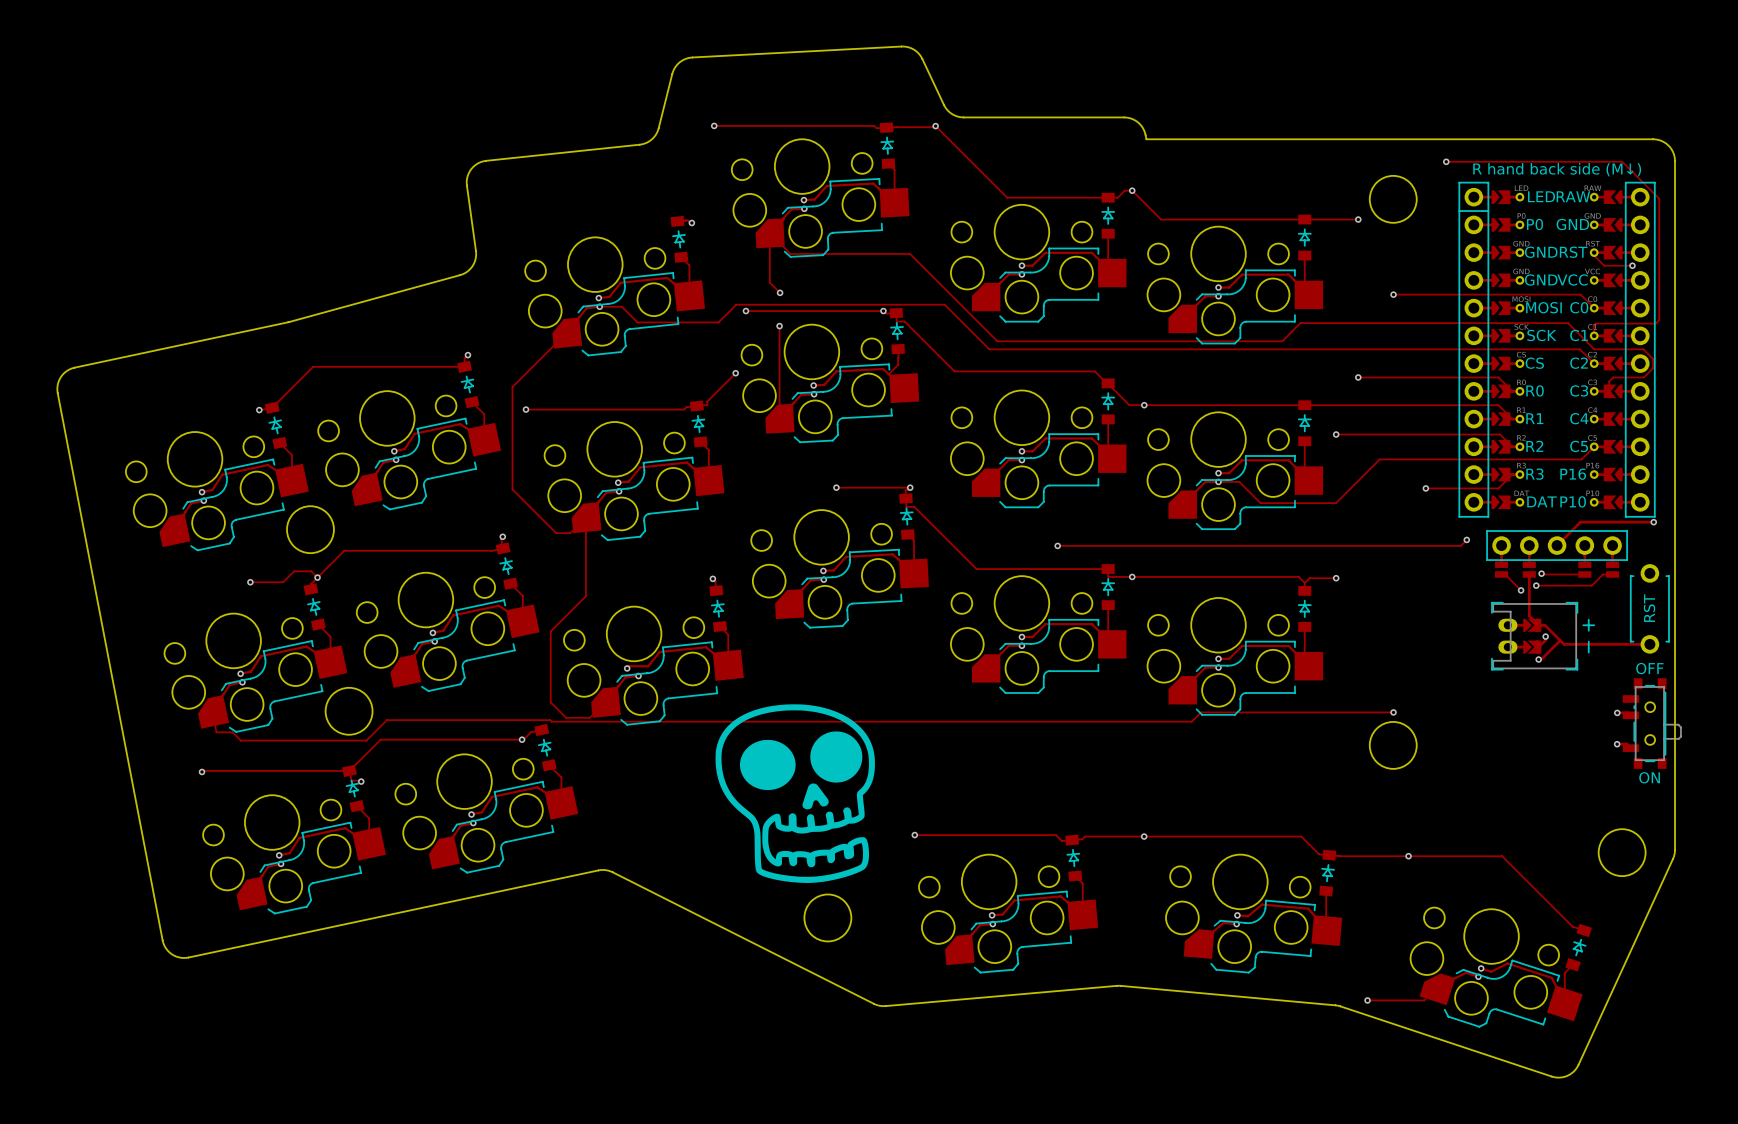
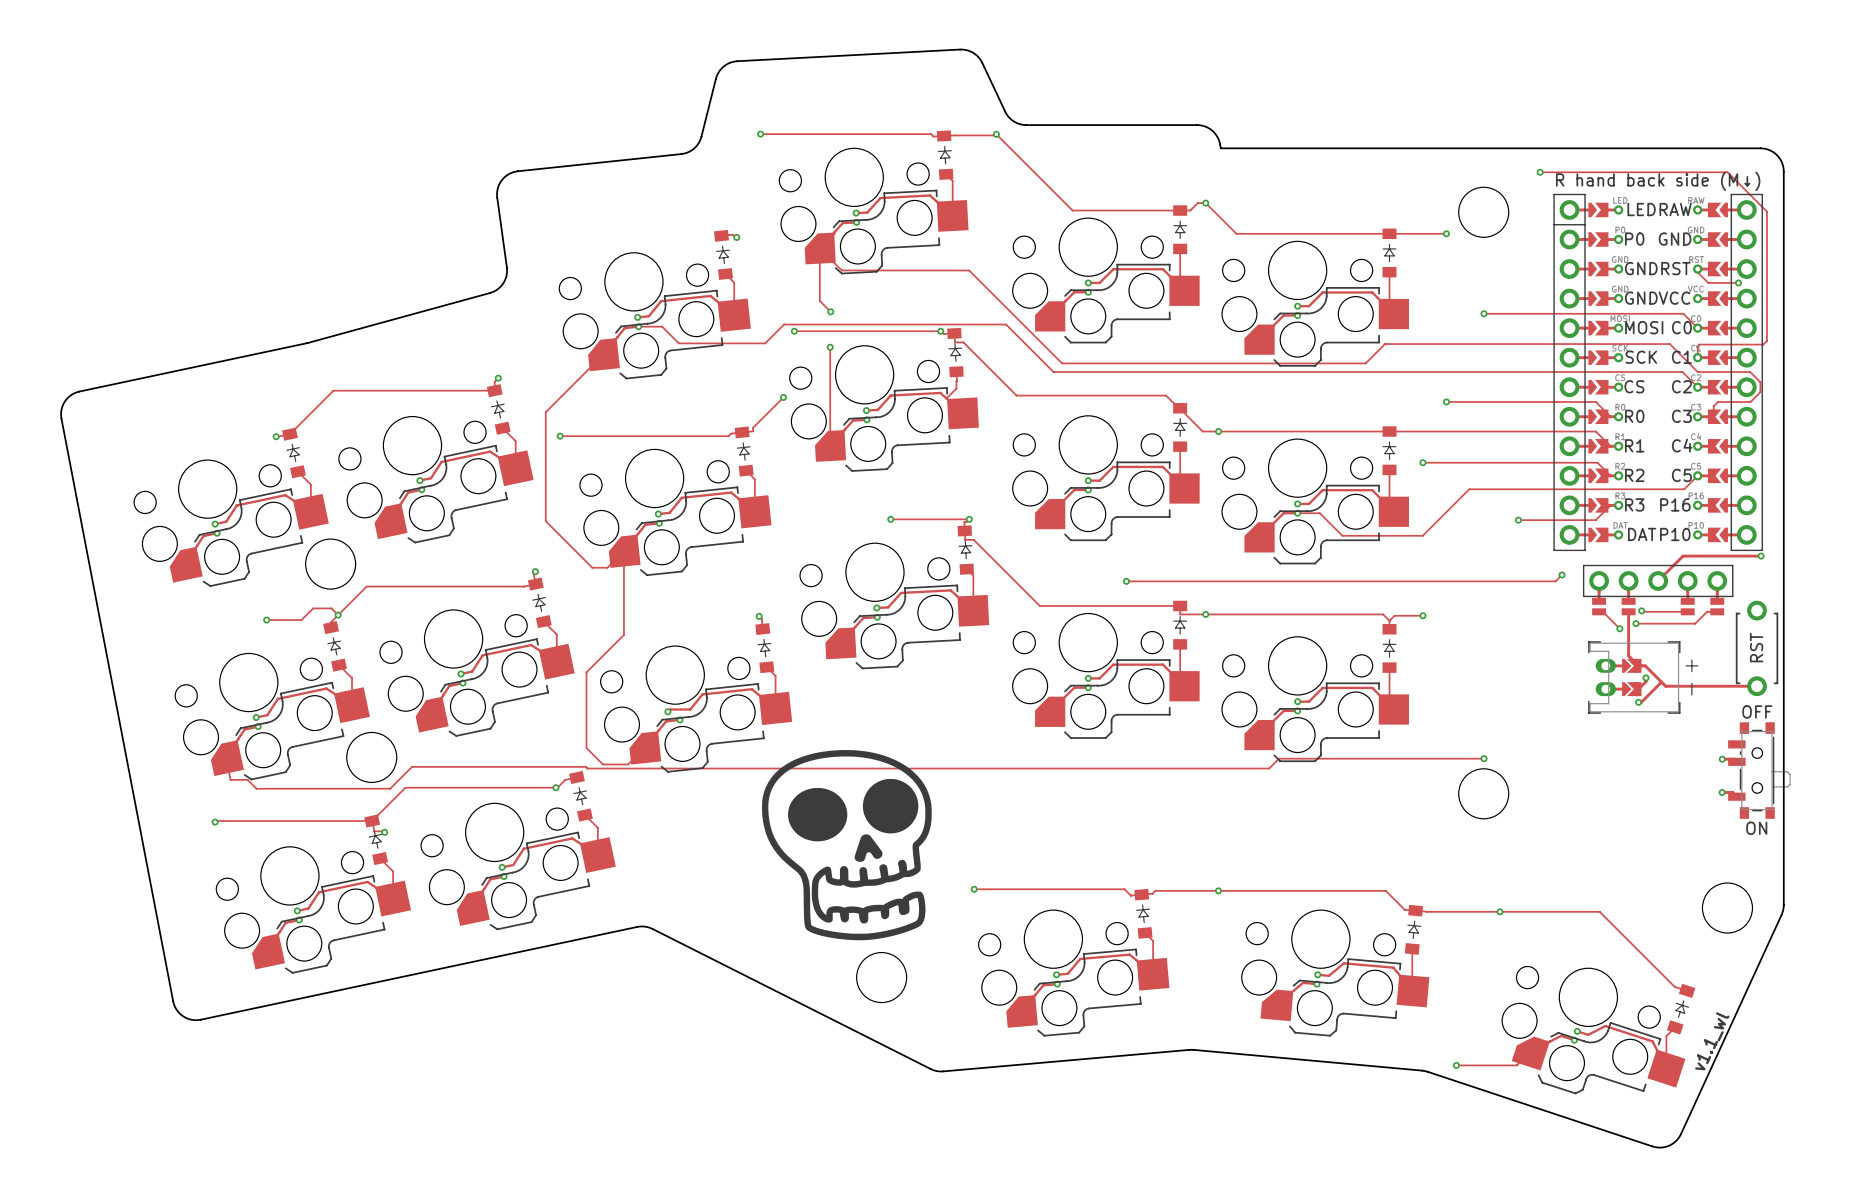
text: none -> v1.1_wl (1712, 1041)

